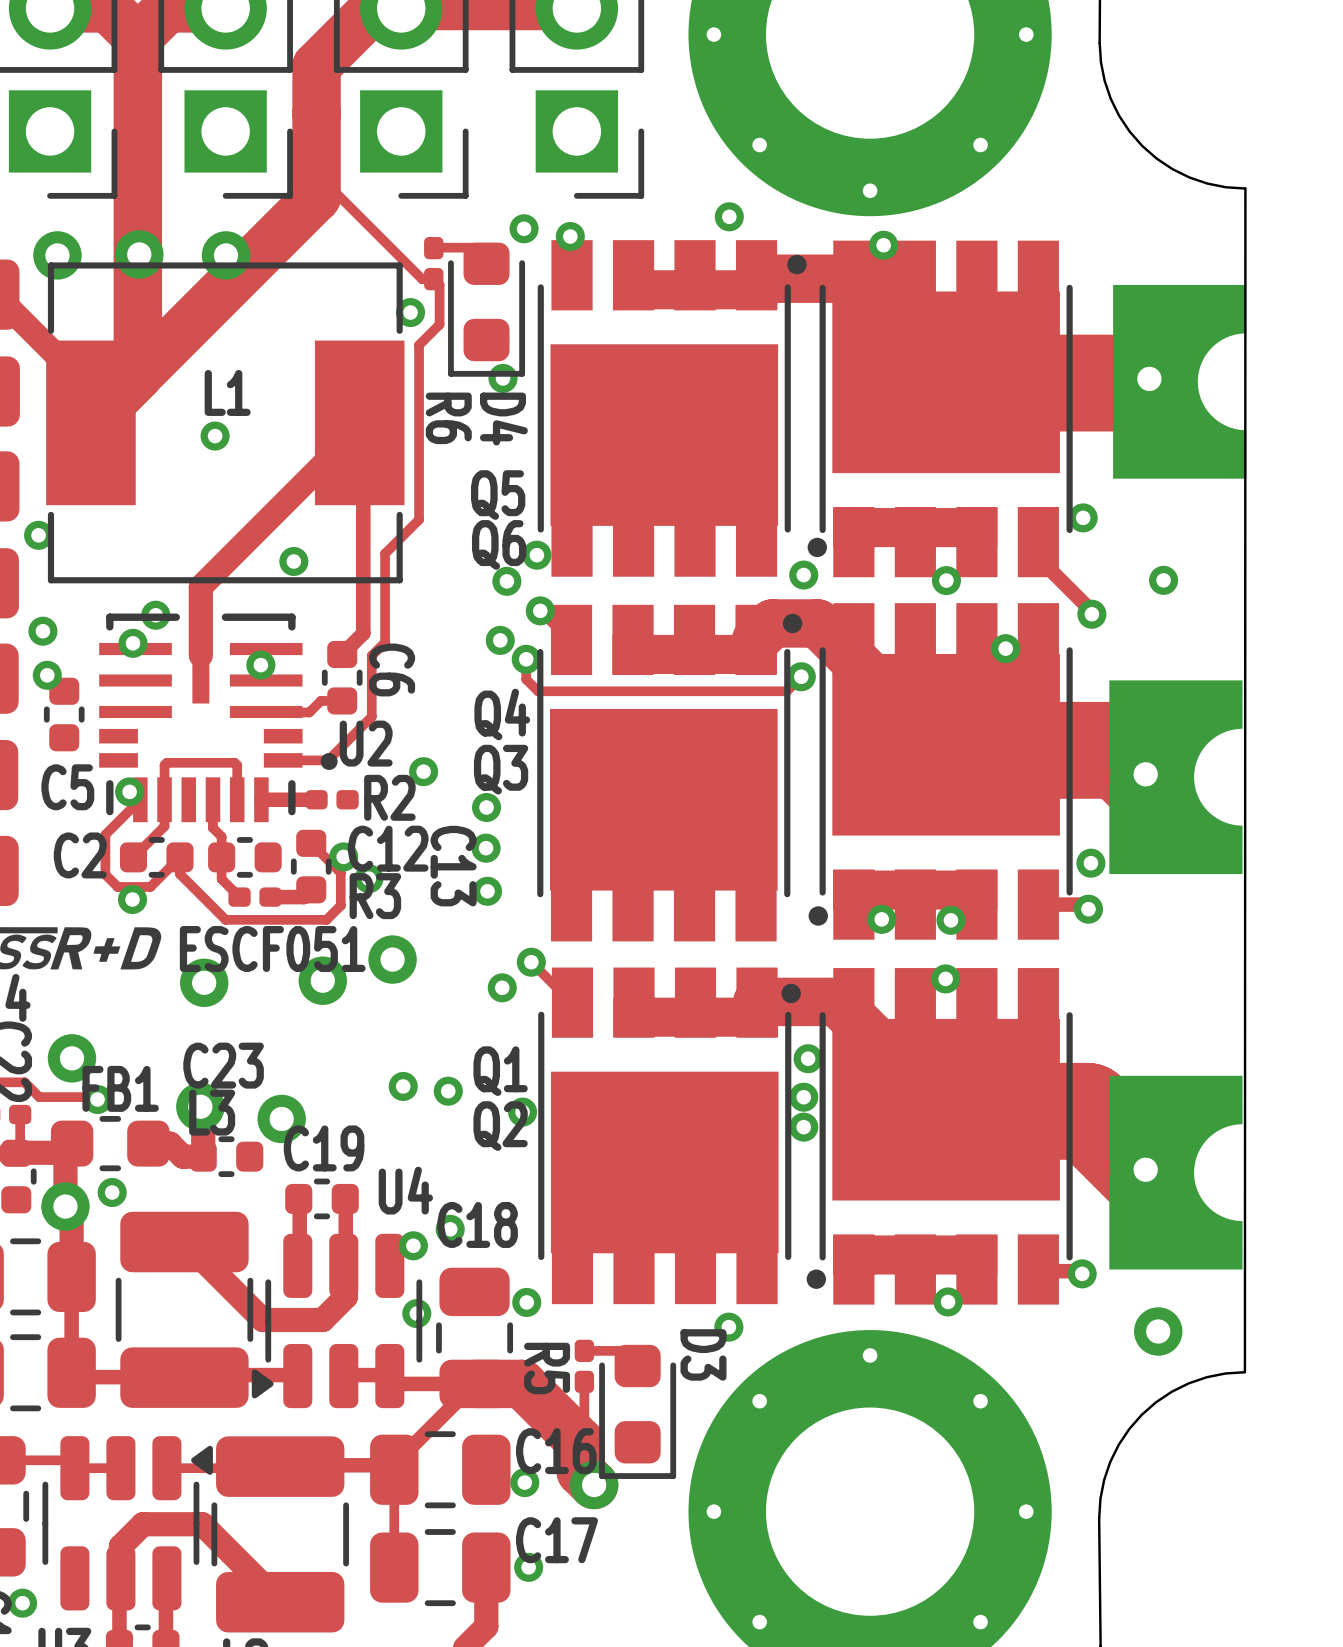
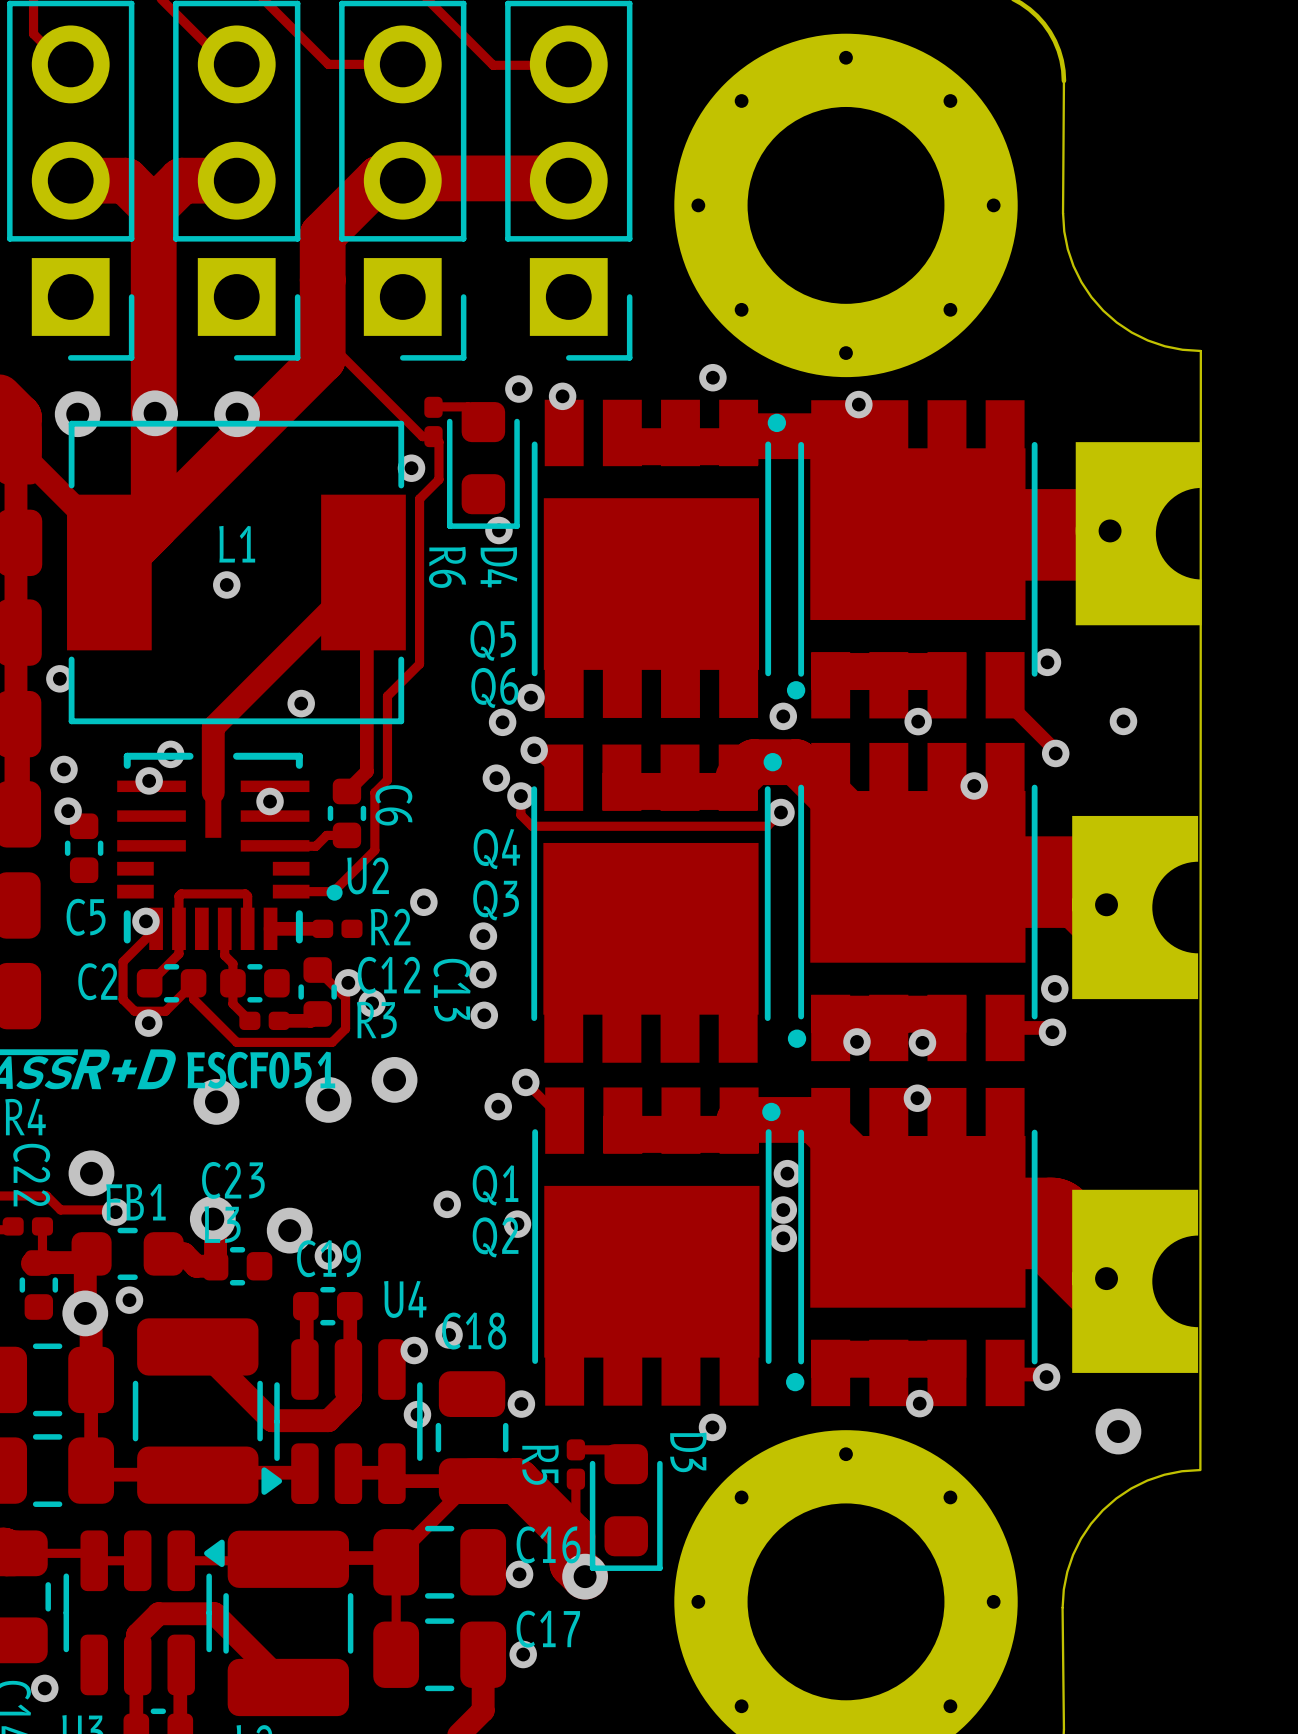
via position: (403, 1086) -> (328, 1255)

